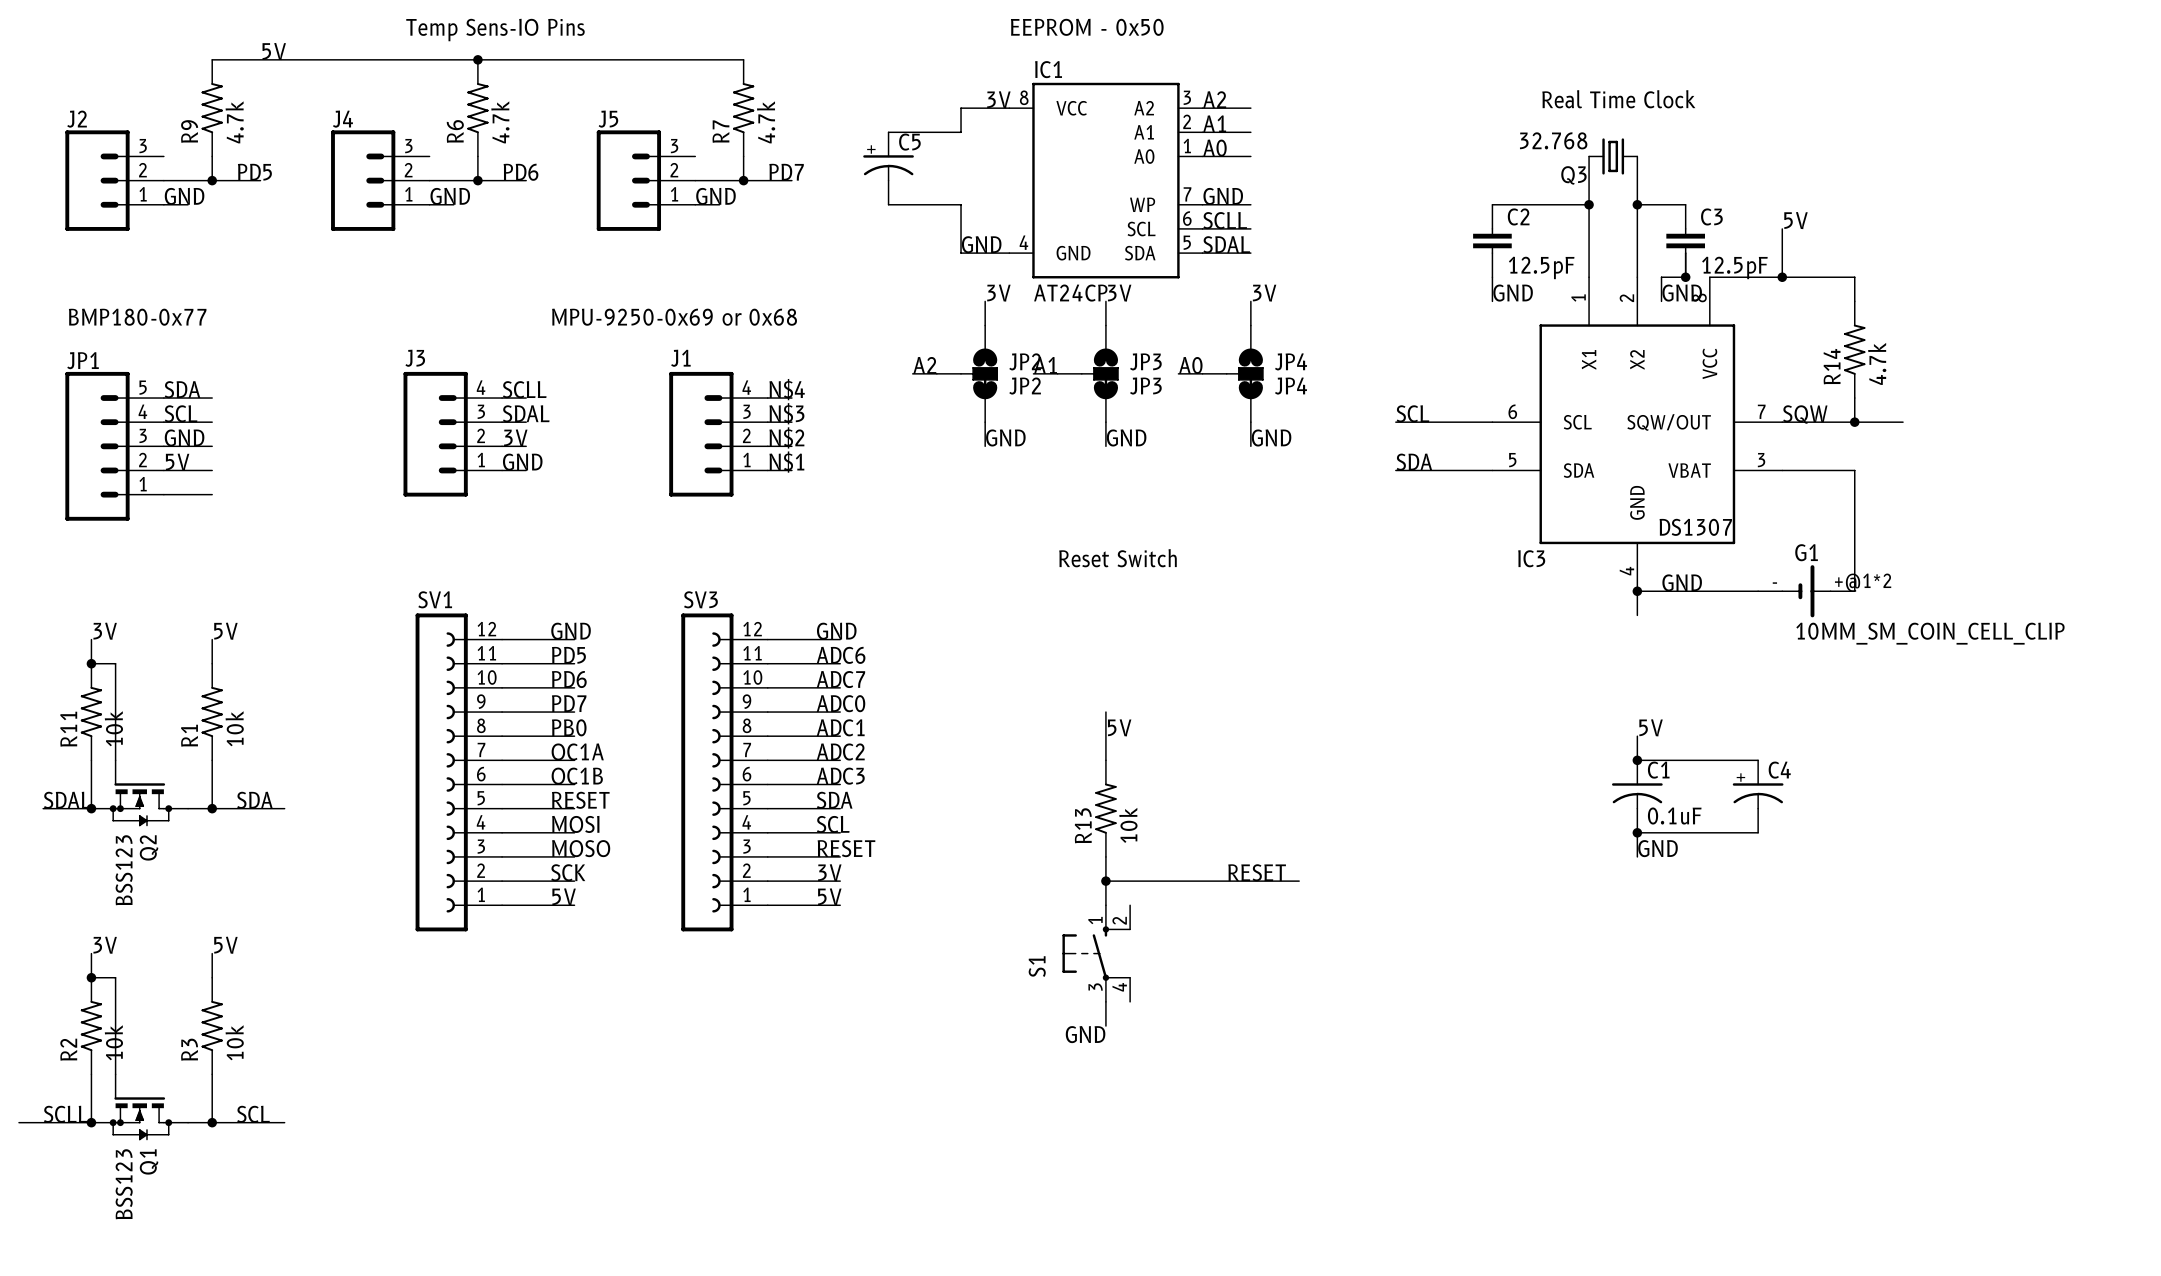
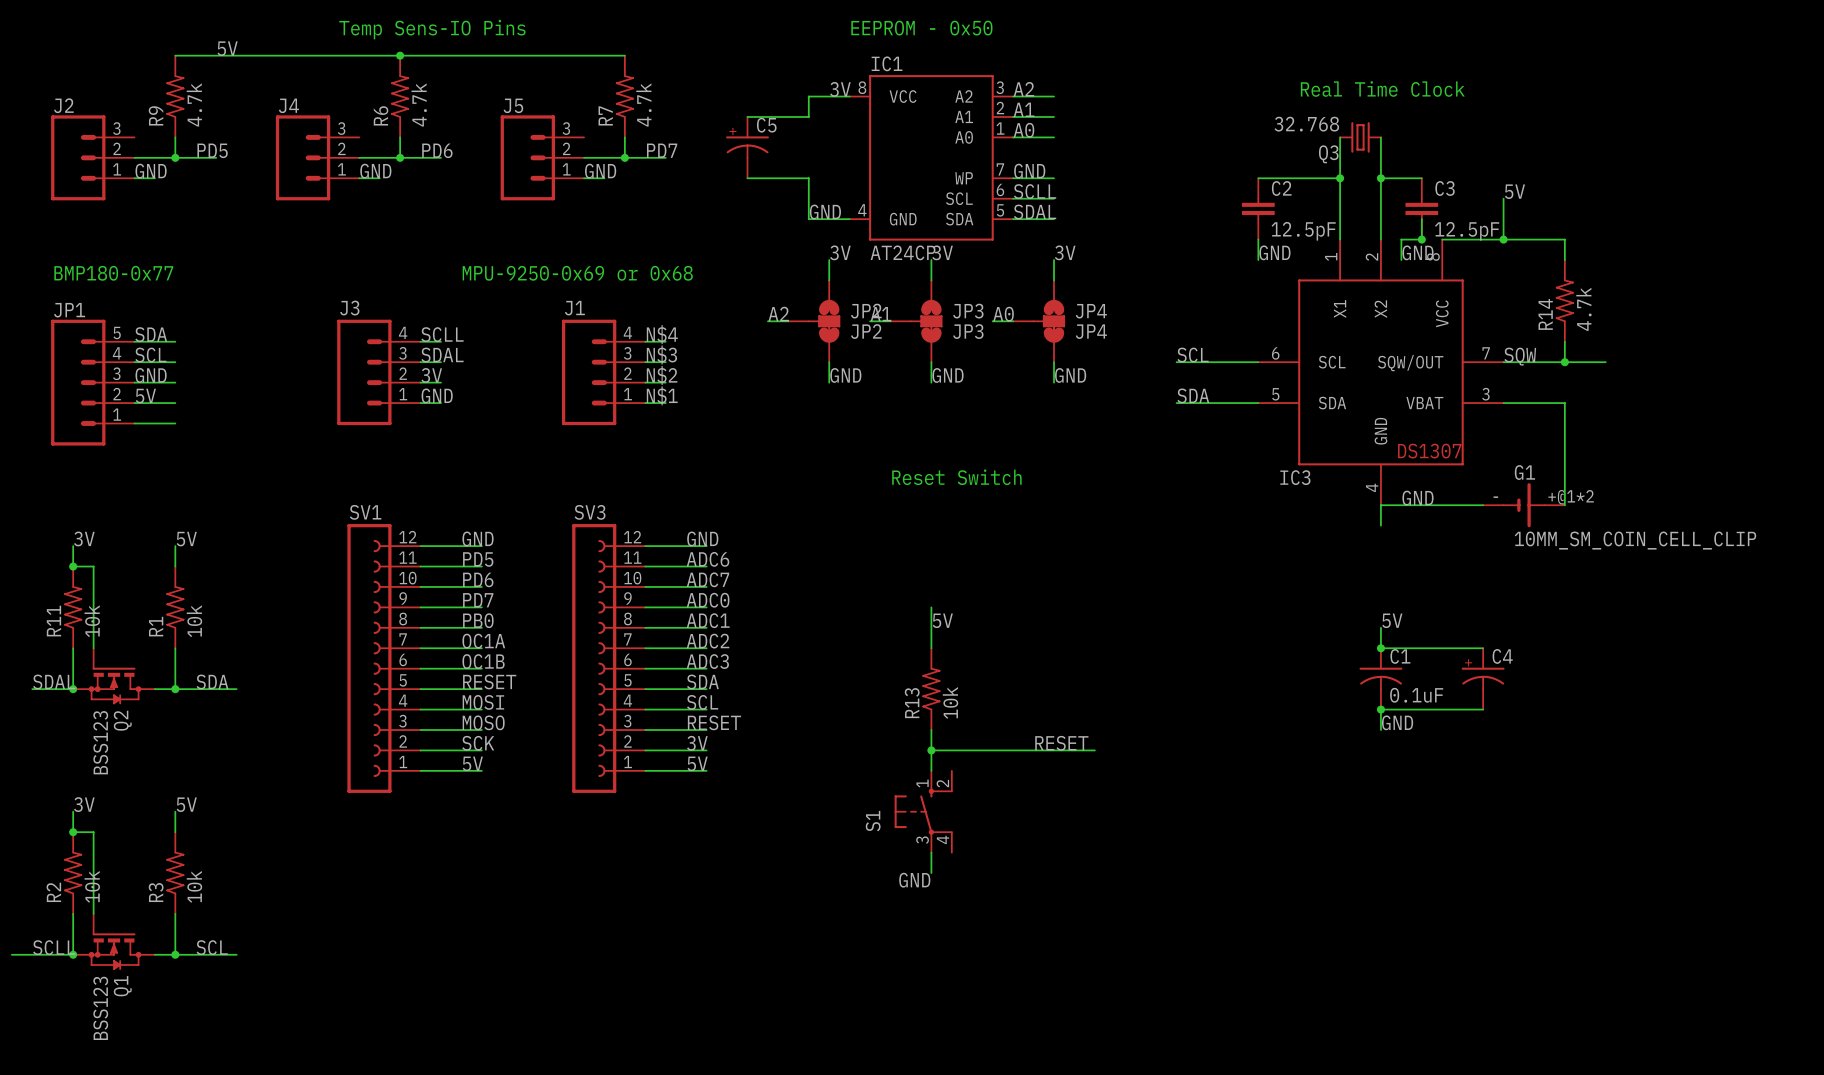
junction: (1637, 591) -> none

